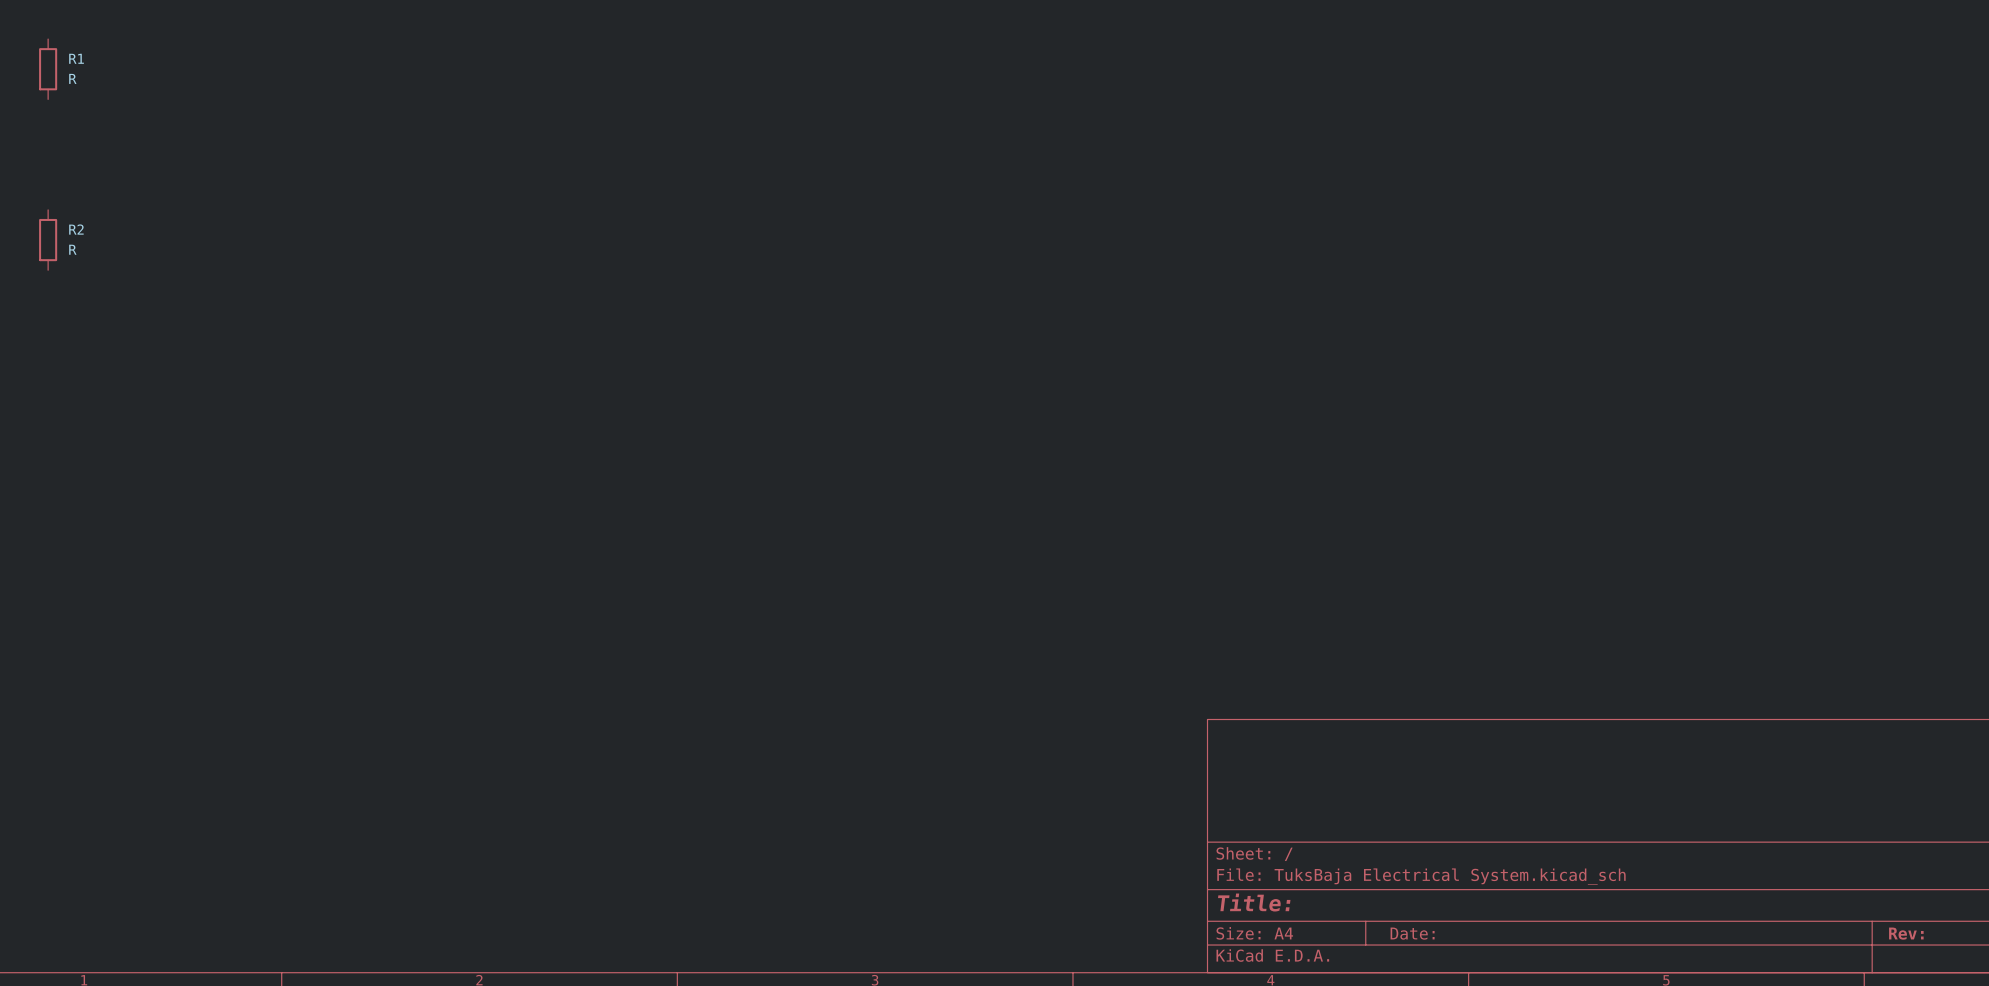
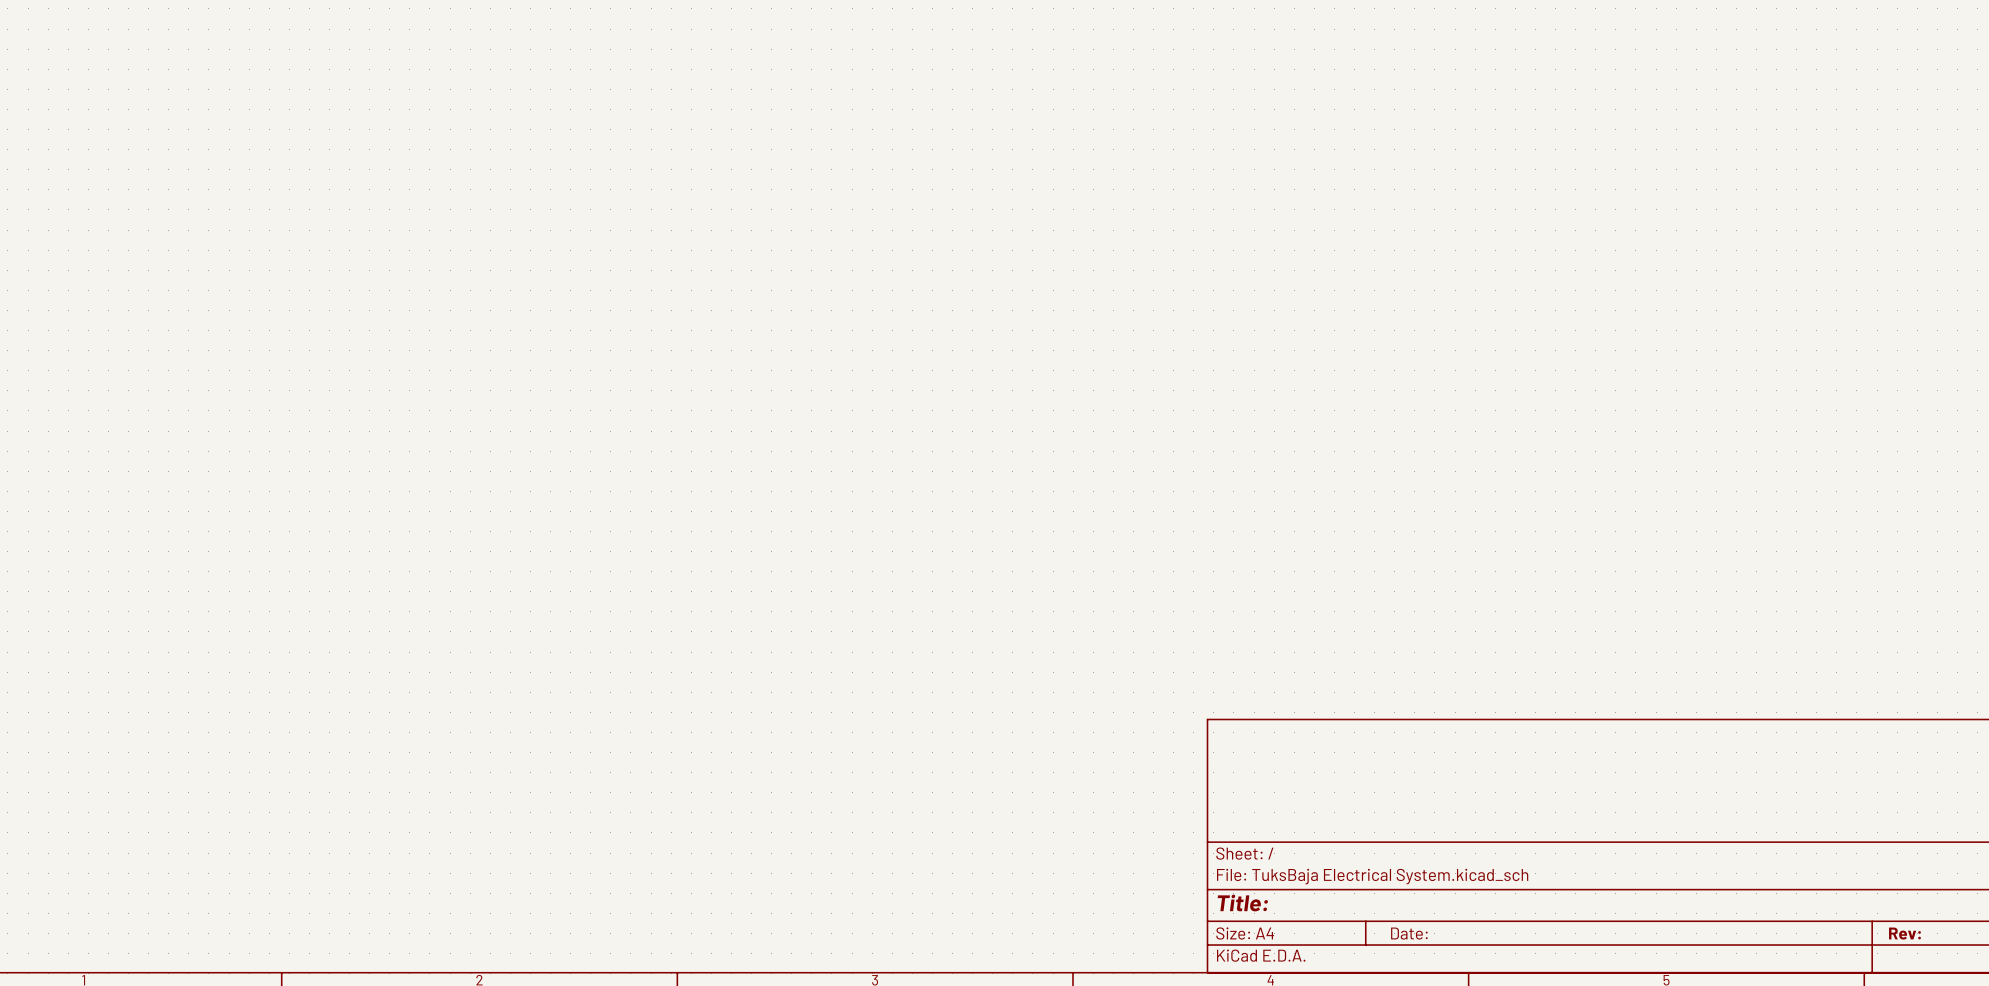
R1: R (48, 69) -> none
R2: R (48, 240) -> none

